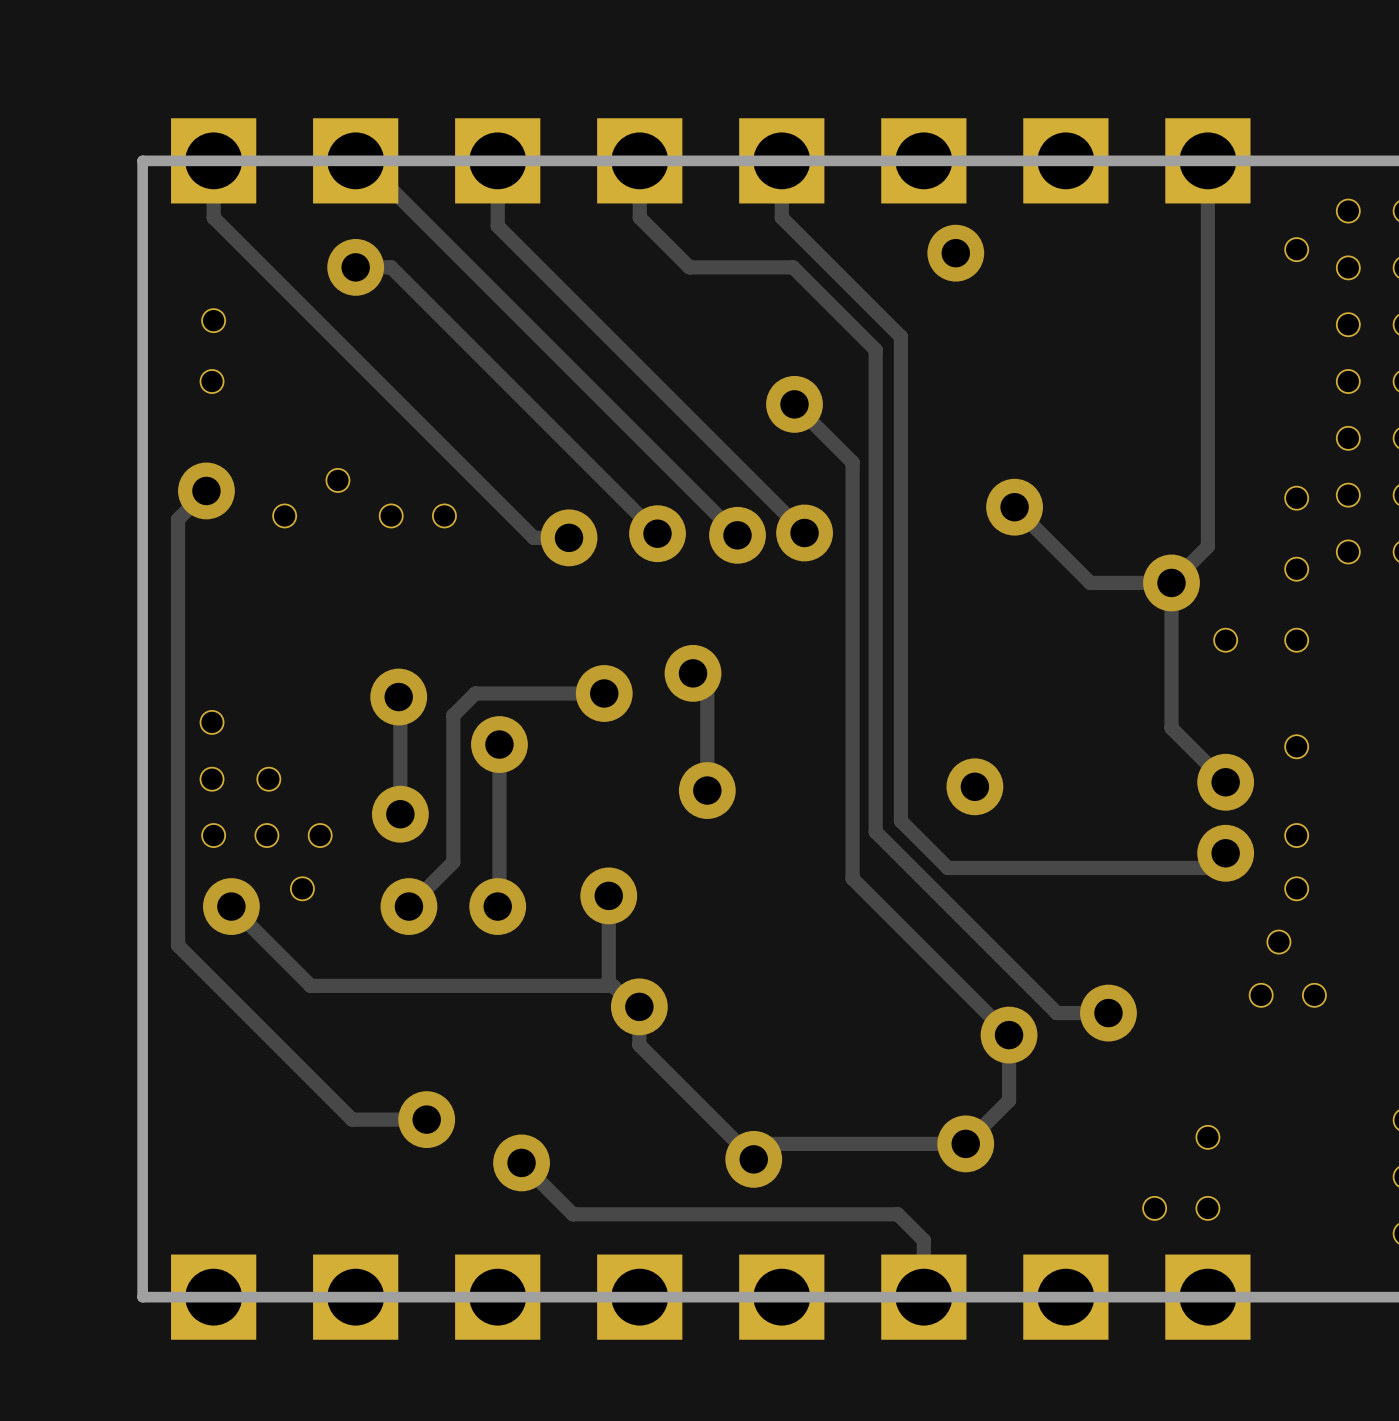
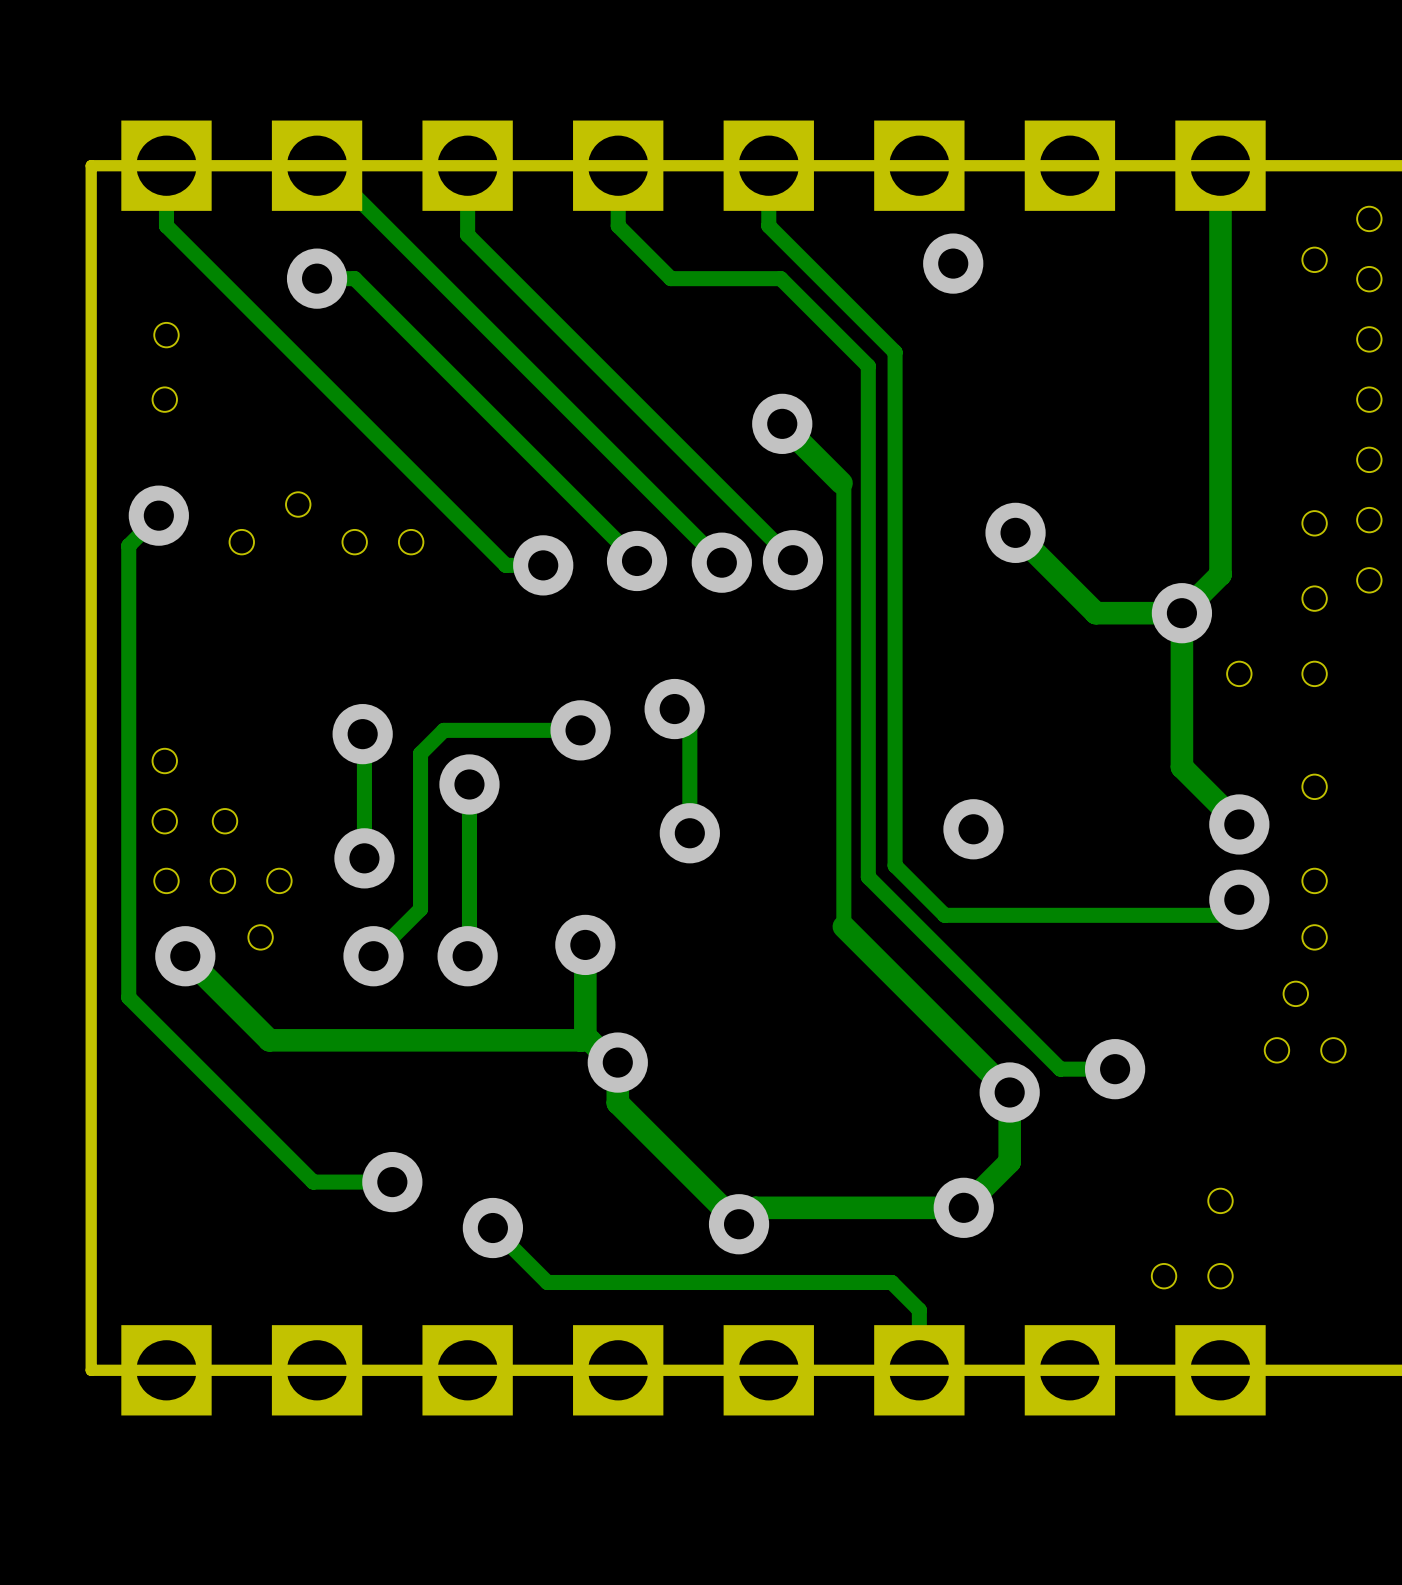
track width: thin (1207, 160) (1207, 546) (1171, 582) -> thick (1220, 165) (1220, 574) (1181, 613)
track width: thin (794, 404) (850, 460) -> thick (782, 423) (841, 483)
track width: thin (1014, 507) (1090, 582) (1171, 582) -> thick (1015, 532) (1095, 613) (1181, 613)
track width: thin (1171, 582) (1171, 728) (1225, 782) -> thick (1181, 613) (1181, 767) (1239, 824)
track width: thin (852, 878) (1009, 1035) (1009, 1100) (965, 1143) (769, 1143) (753, 1159) (639, 1045) (639, 1006) (633, 1006) (612, 985) (310, 985) (231, 906) -> thick (843, 926) (1009, 1092) (1009, 1161) (963, 1207) (755, 1207) (739, 1224) (617, 1103) (617, 1062) (612, 1062) (589, 1040) (269, 1040) (185, 956)
track width: thin (608, 895) (608, 981) (604, 985) -> thick (585, 944) (585, 1035) (580, 1040)

